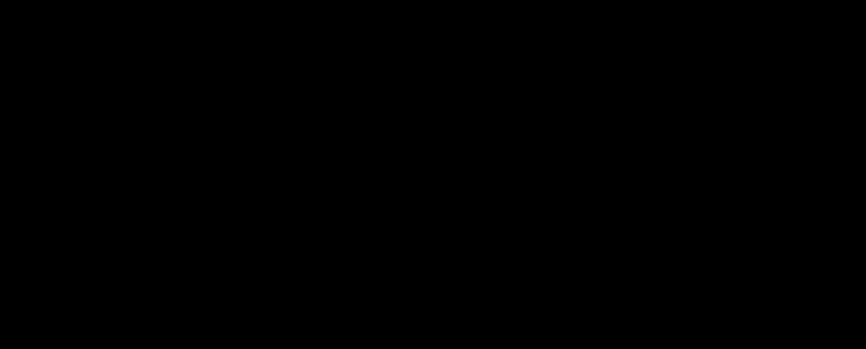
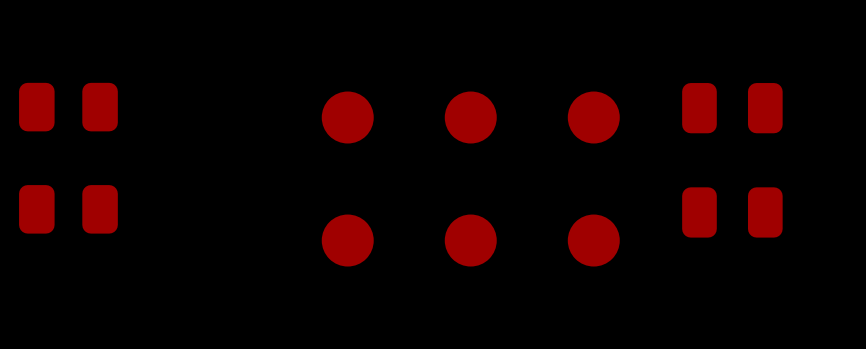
part: none -> (68, 107)
part: none -> (732, 108)
part: none -> (347, 117)
part: none -> (470, 117)
part: none -> (593, 117)
part: none -> (68, 209)
part: none -> (732, 212)
part: none -> (347, 240)
part: none -> (470, 240)
part: none -> (593, 240)

